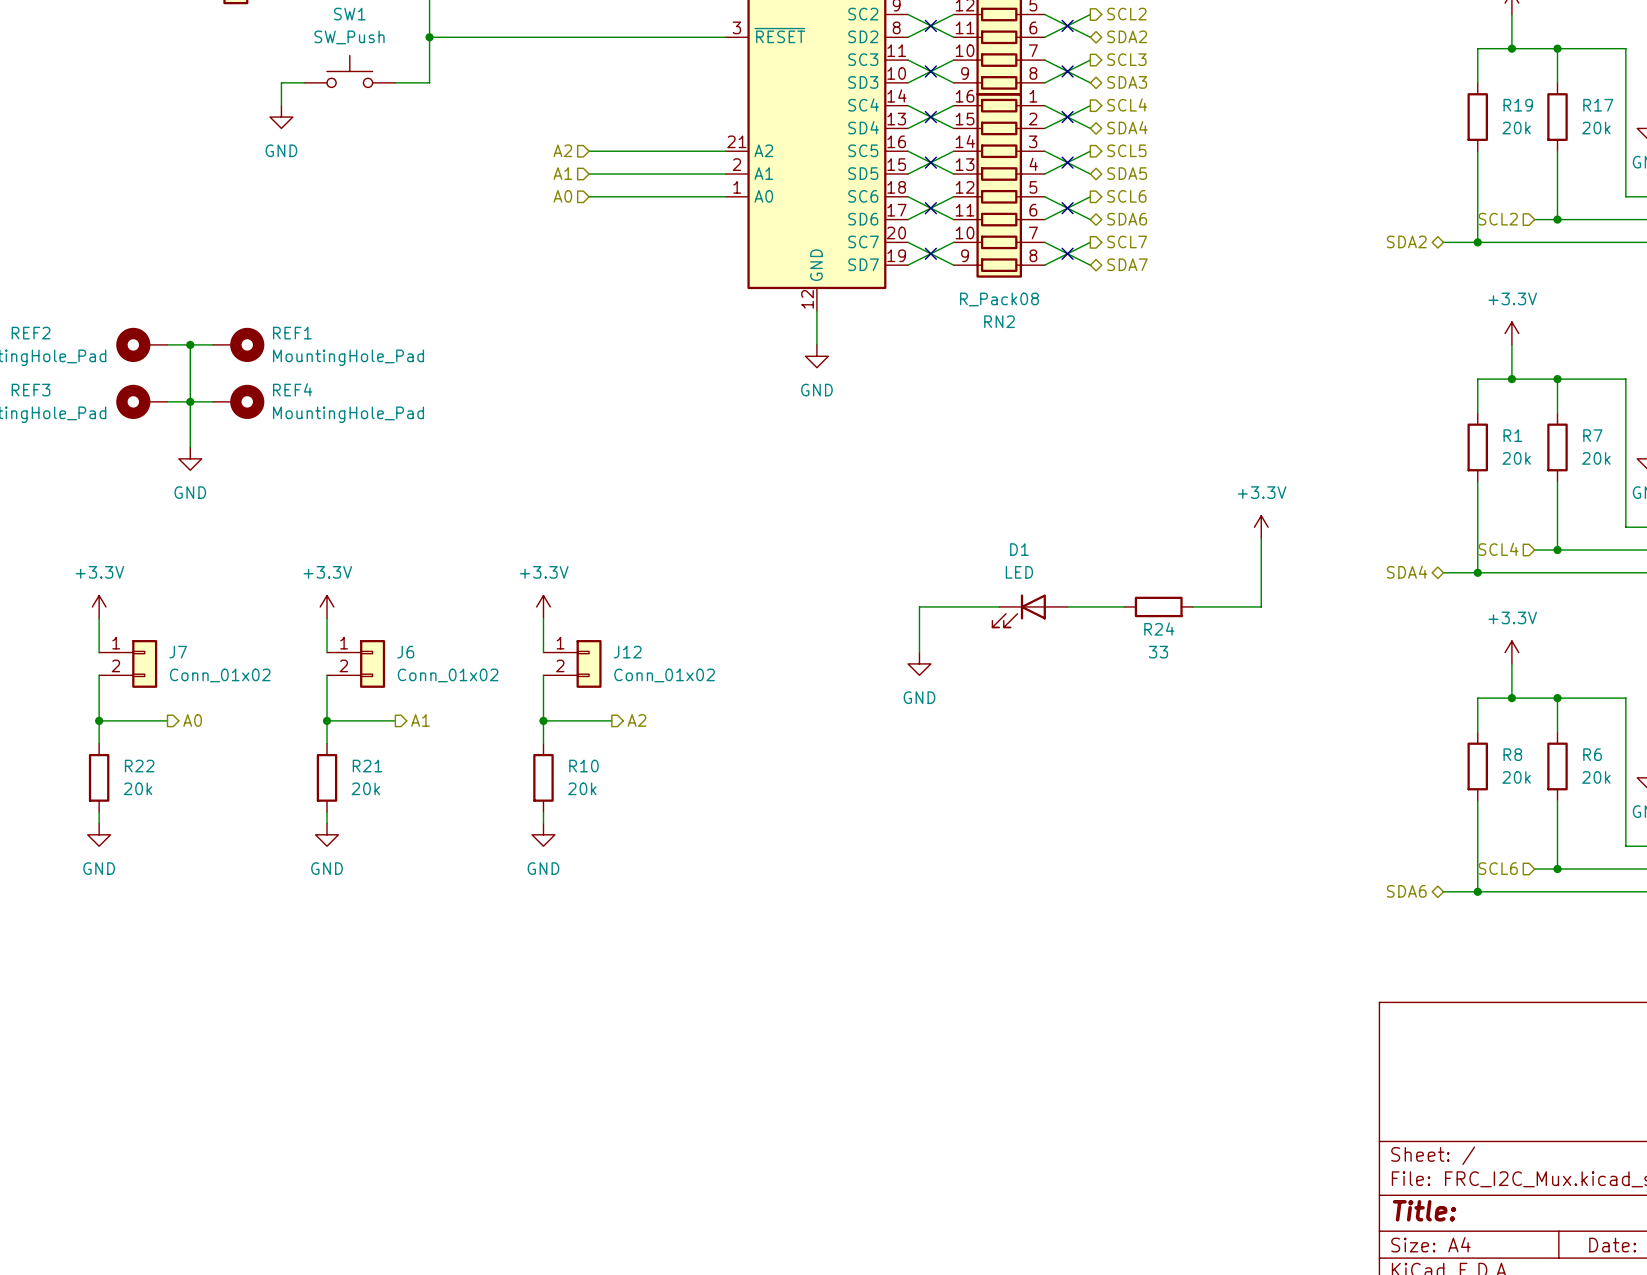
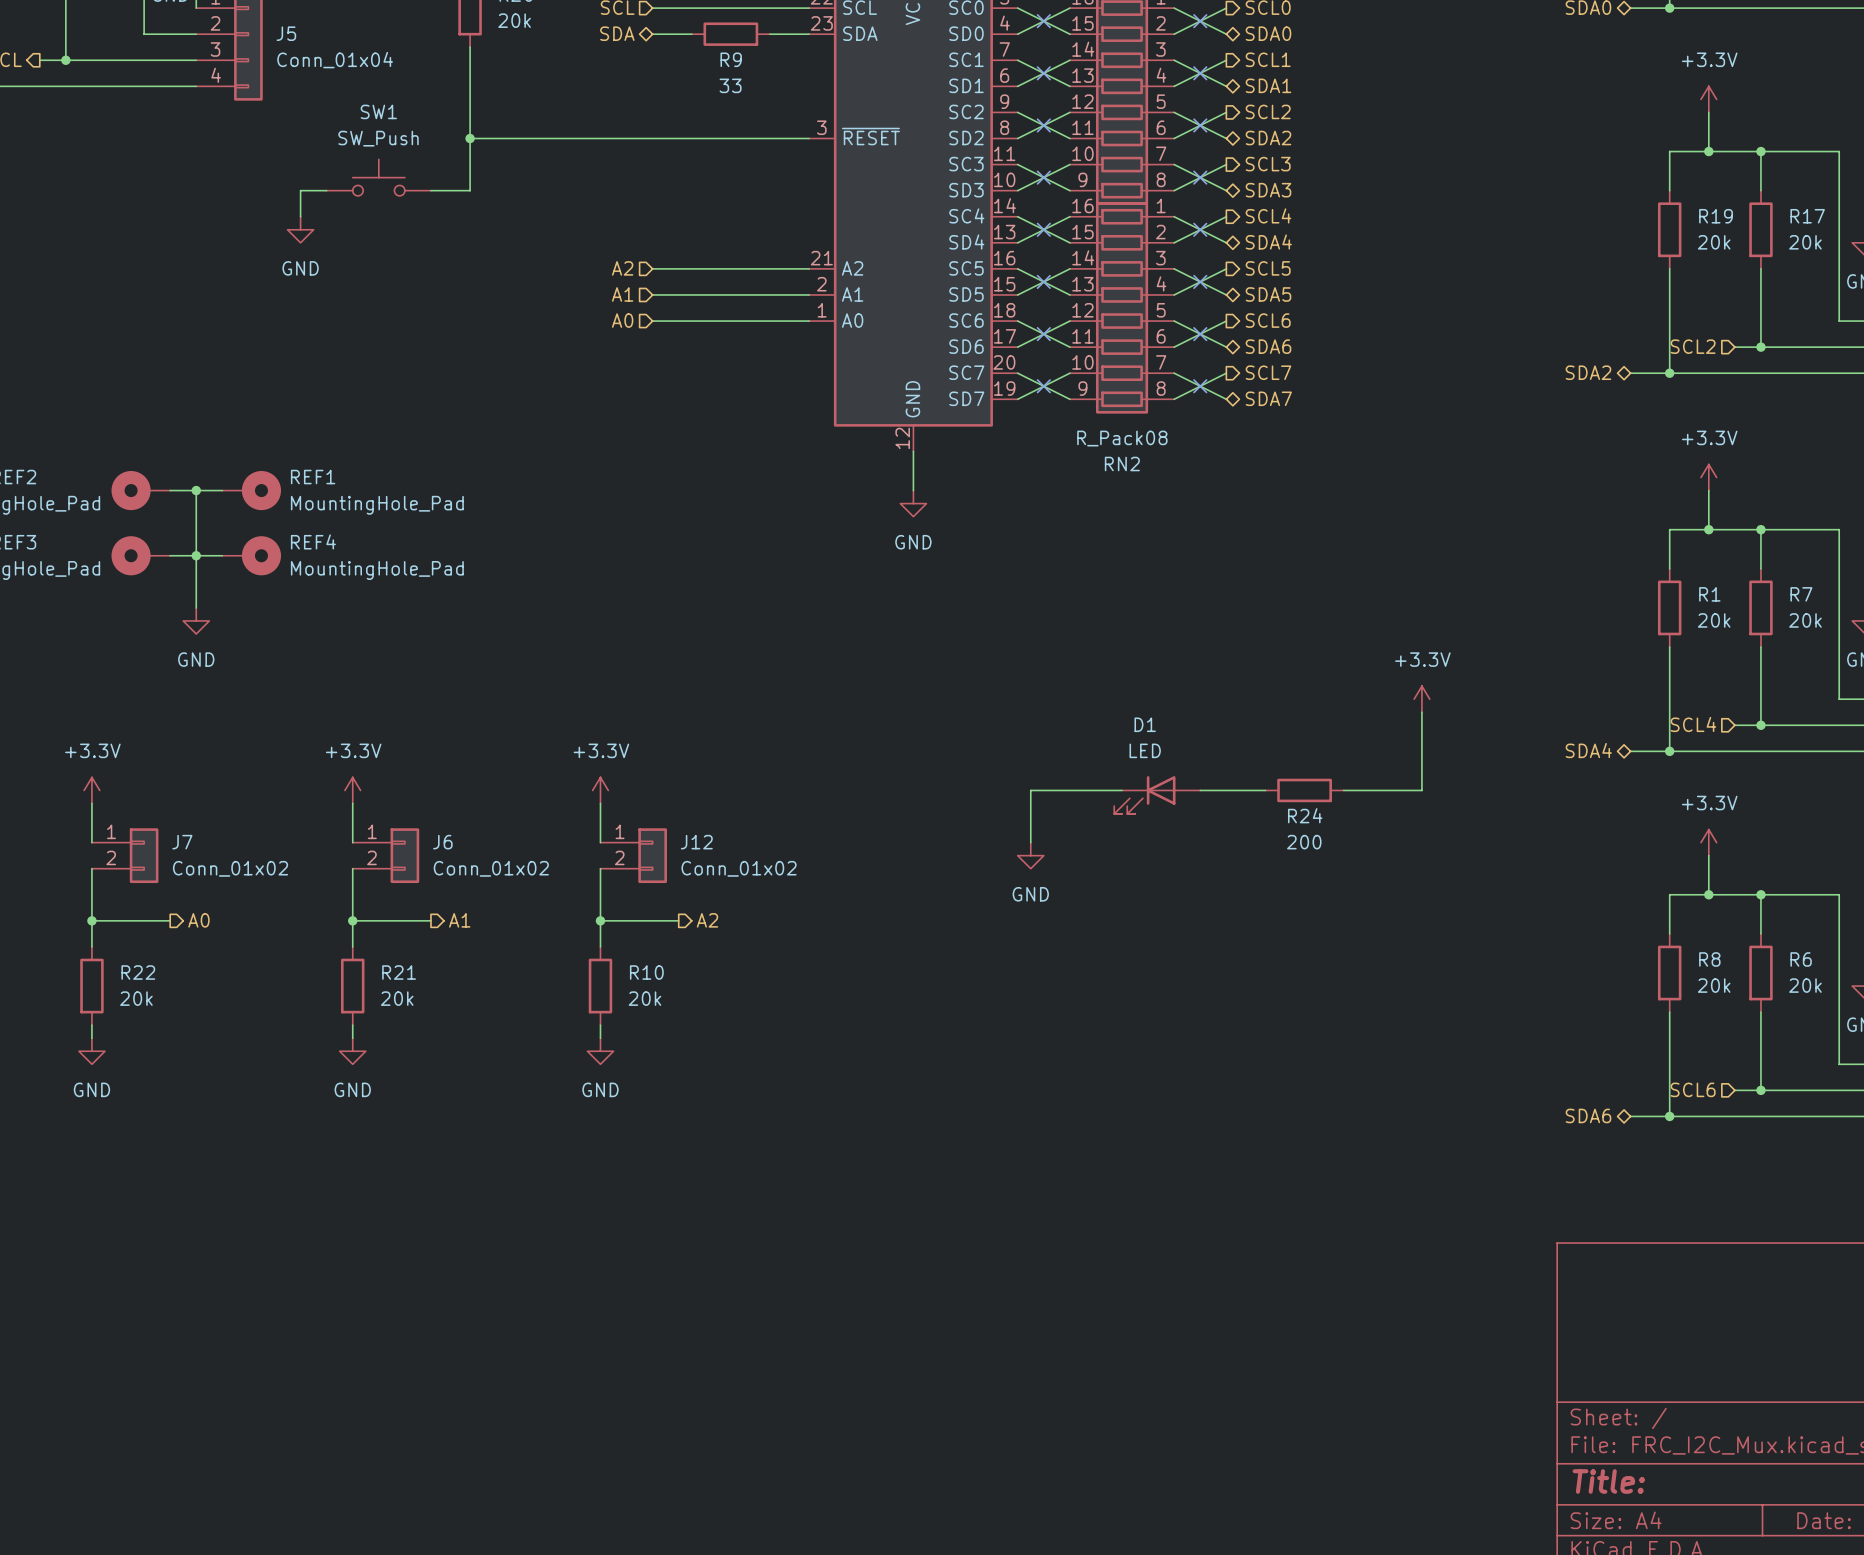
R24 value: 33 (1158, 652) -> 200 (1304, 842)

